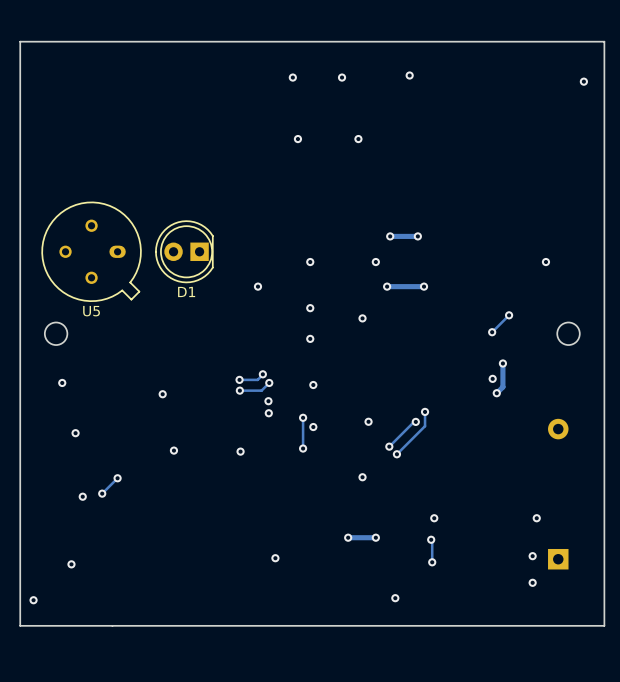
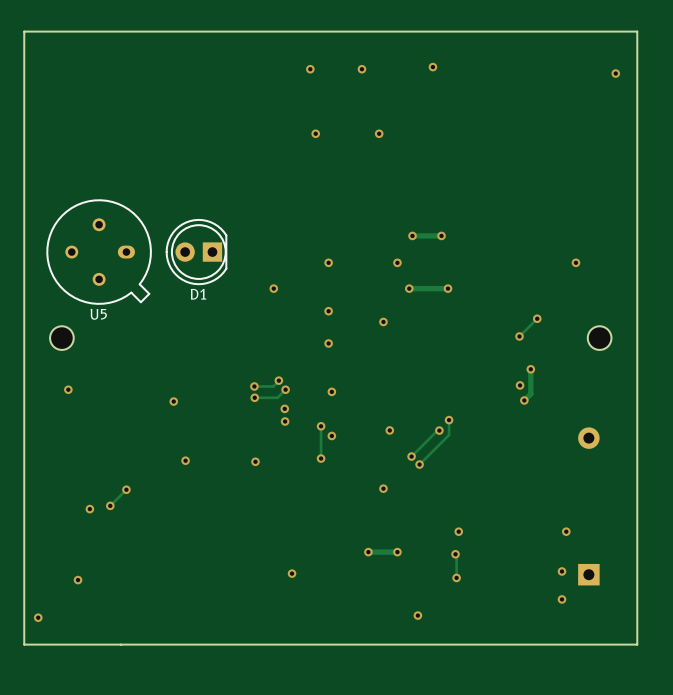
via: (75, 433) -> none

